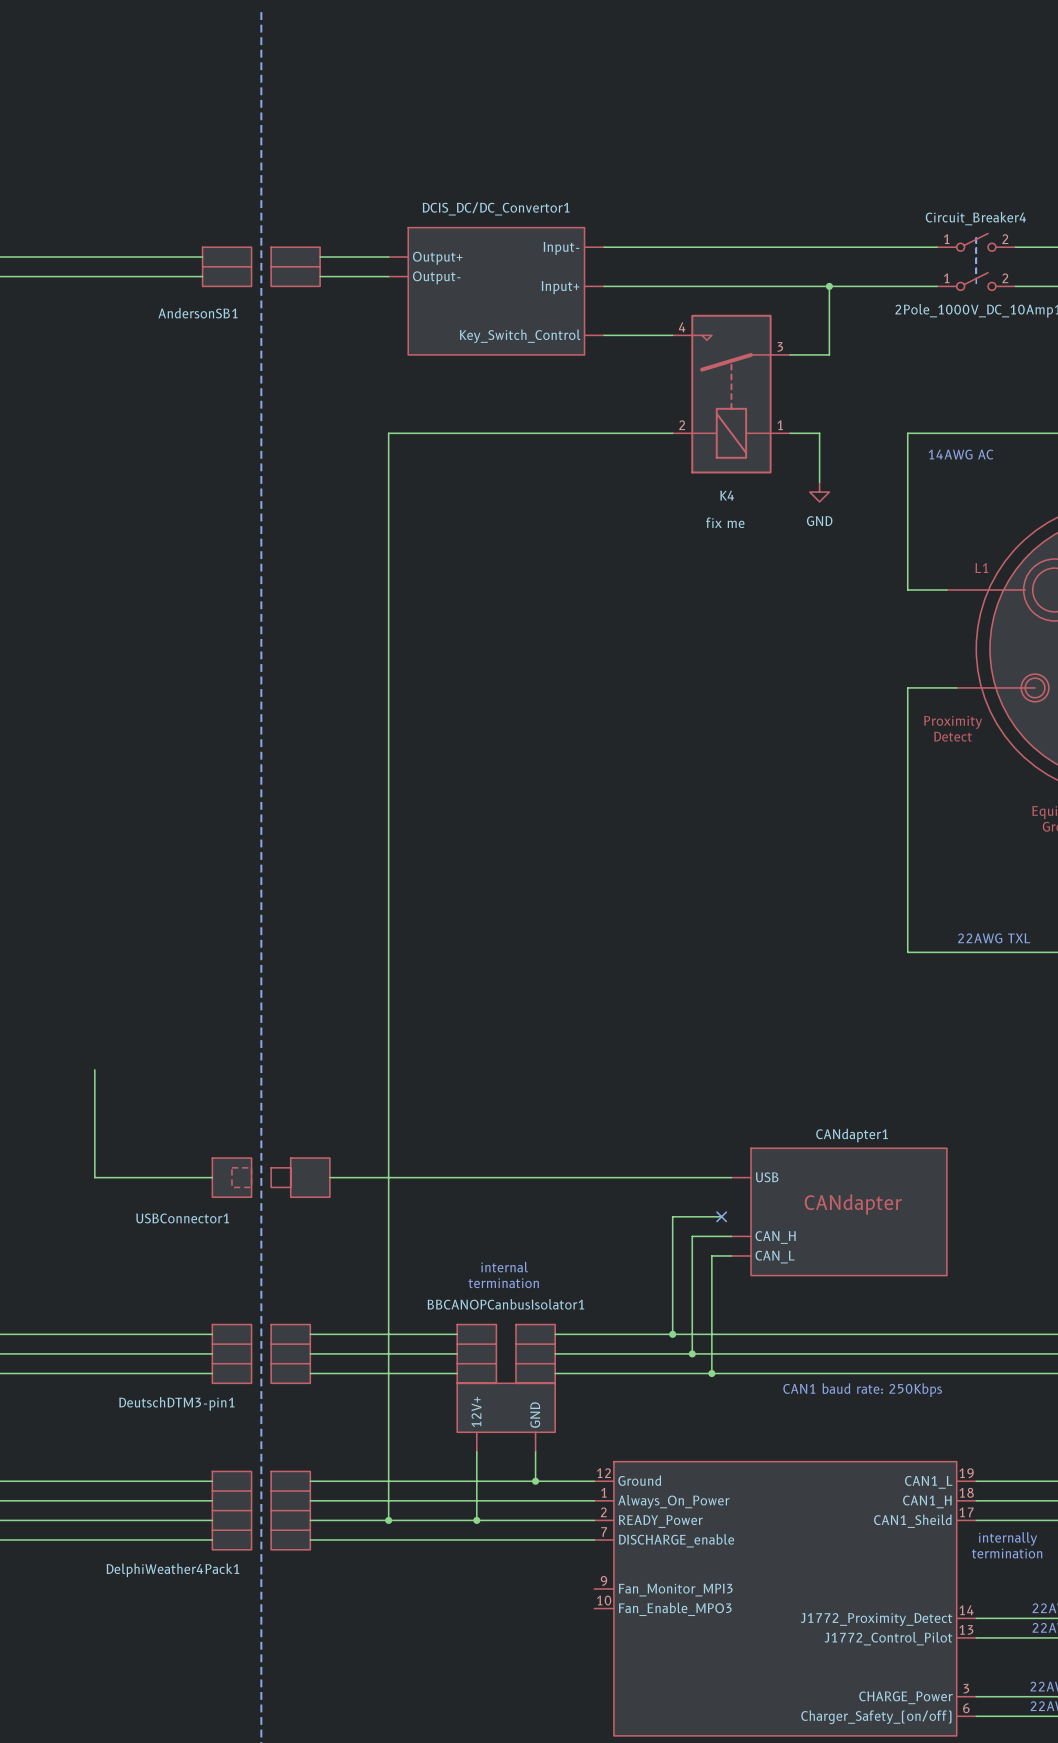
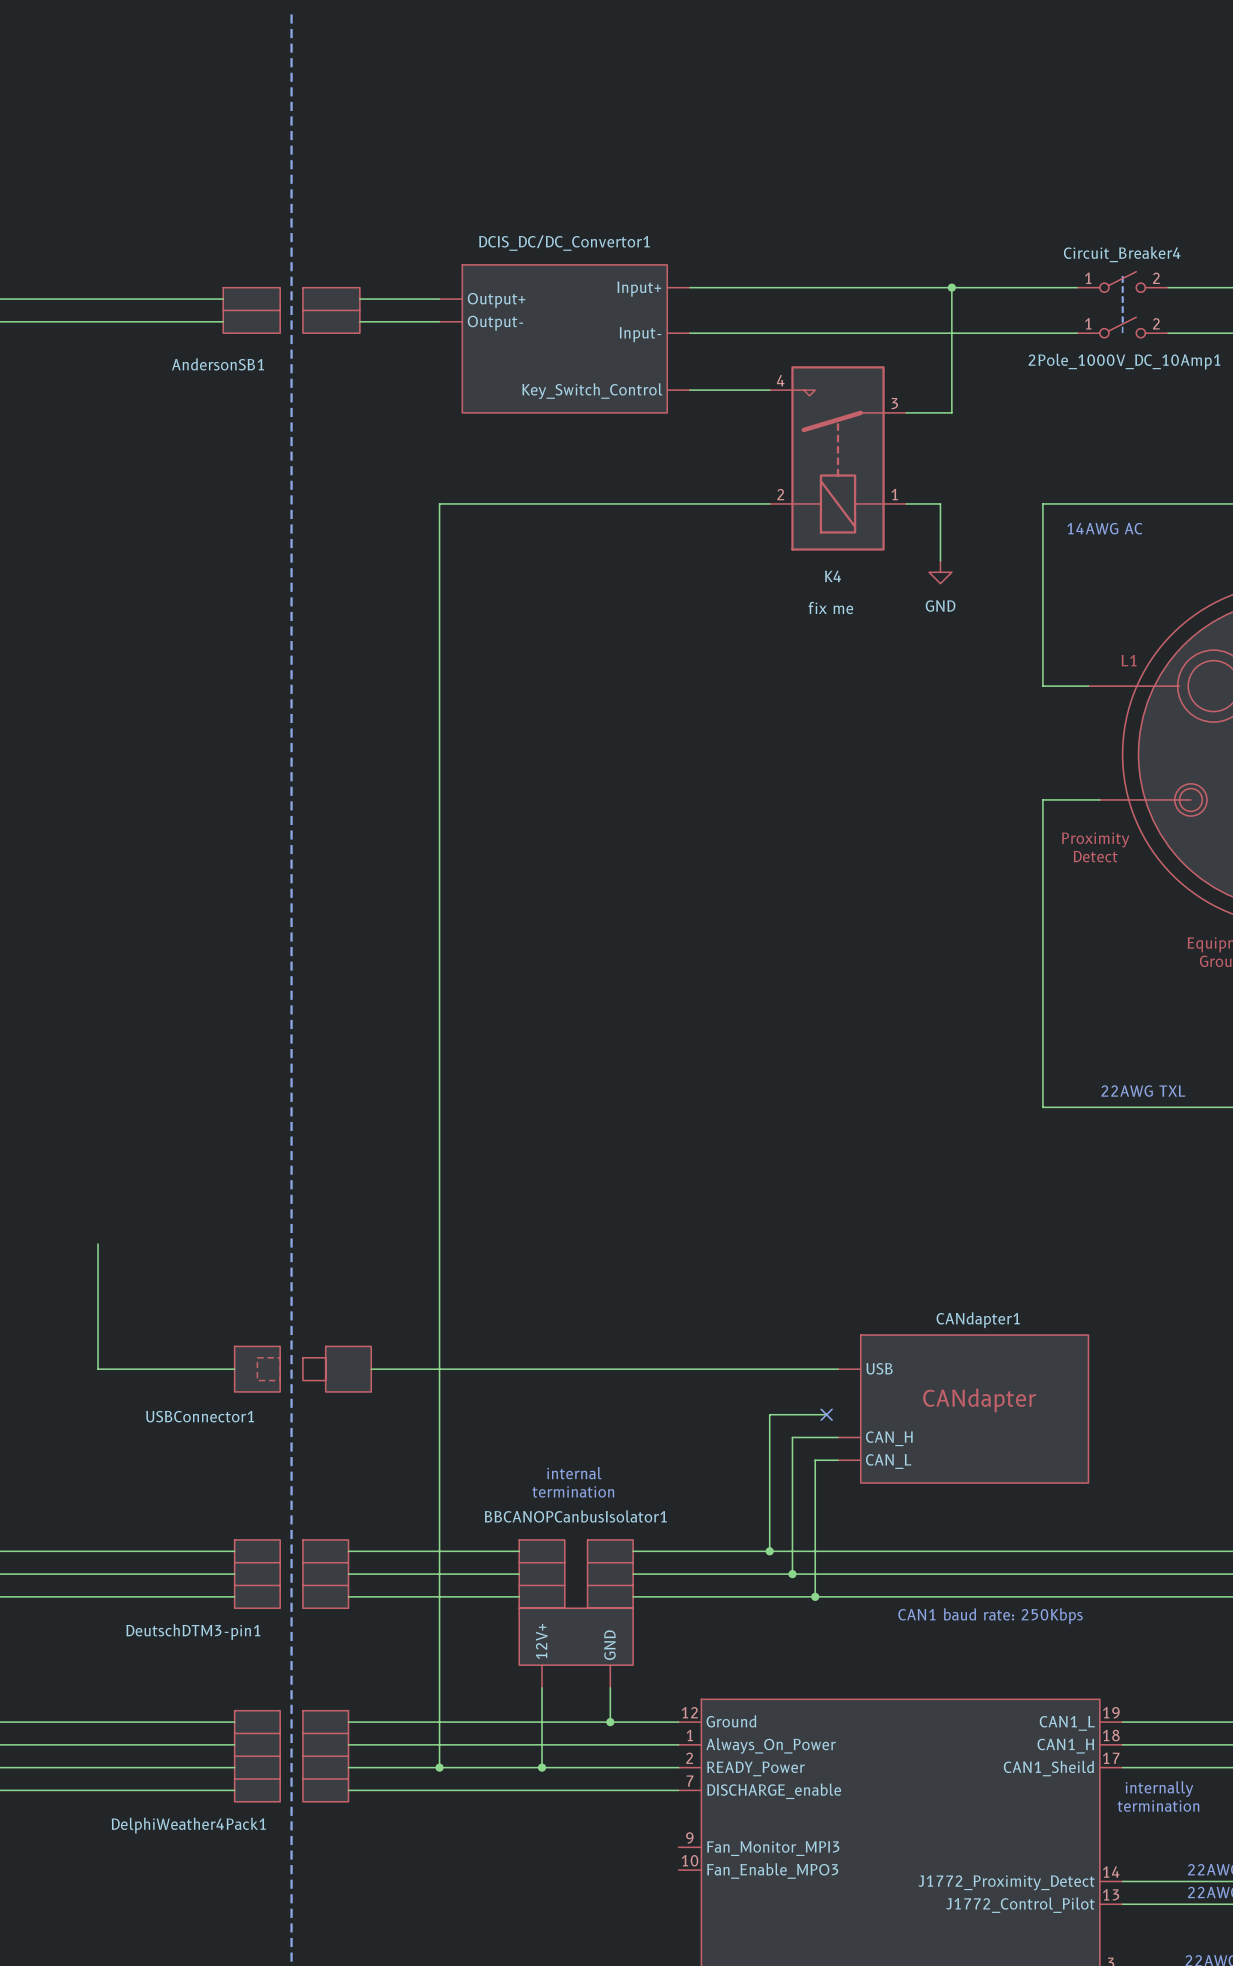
wire: none -> (951, 287) (951, 333)
DCIS_DC/DC_Convertor1 pin name: Input- (561, 248) -> Input+ (639, 289)
junction position: (829, 286) -> (951, 287)
DCIS_DC/DC_Convertor1 pin name: Input+ (560, 287) -> Input- (640, 334)

